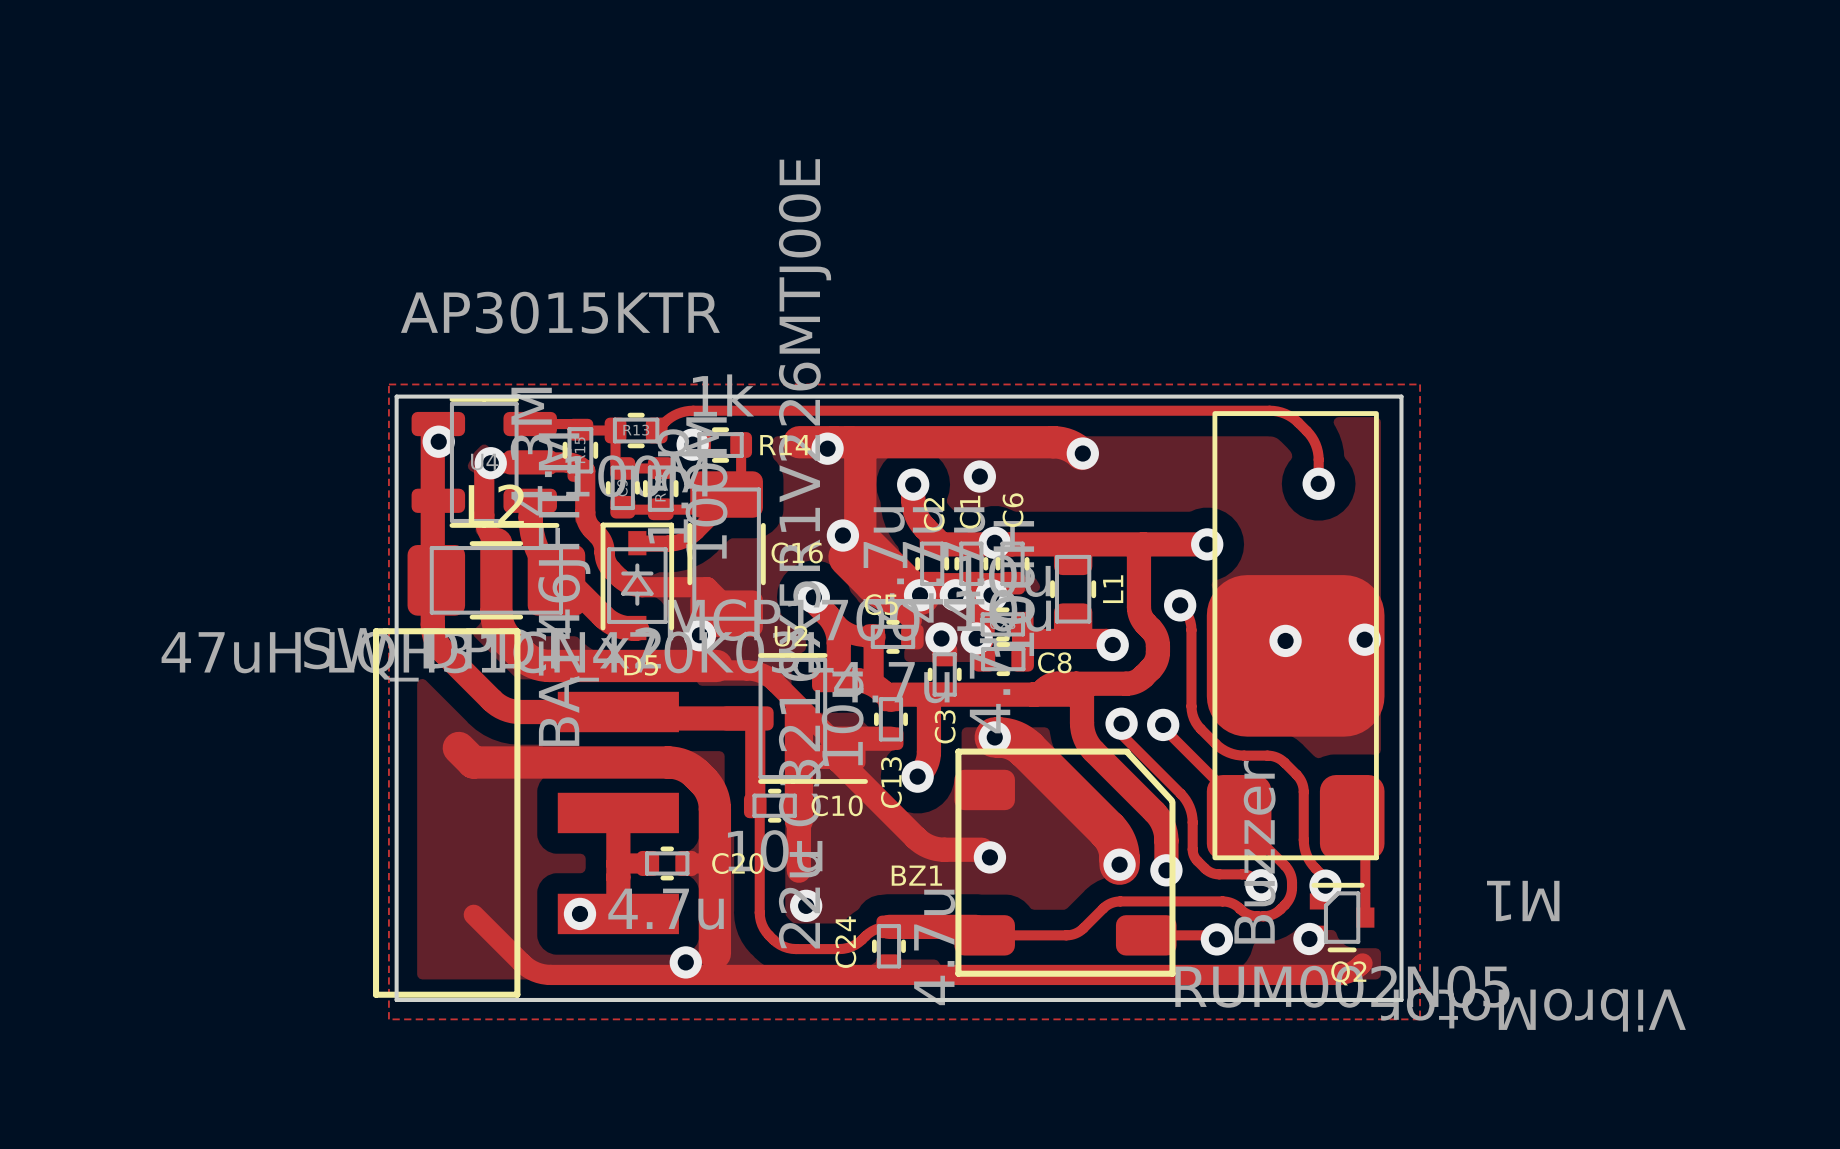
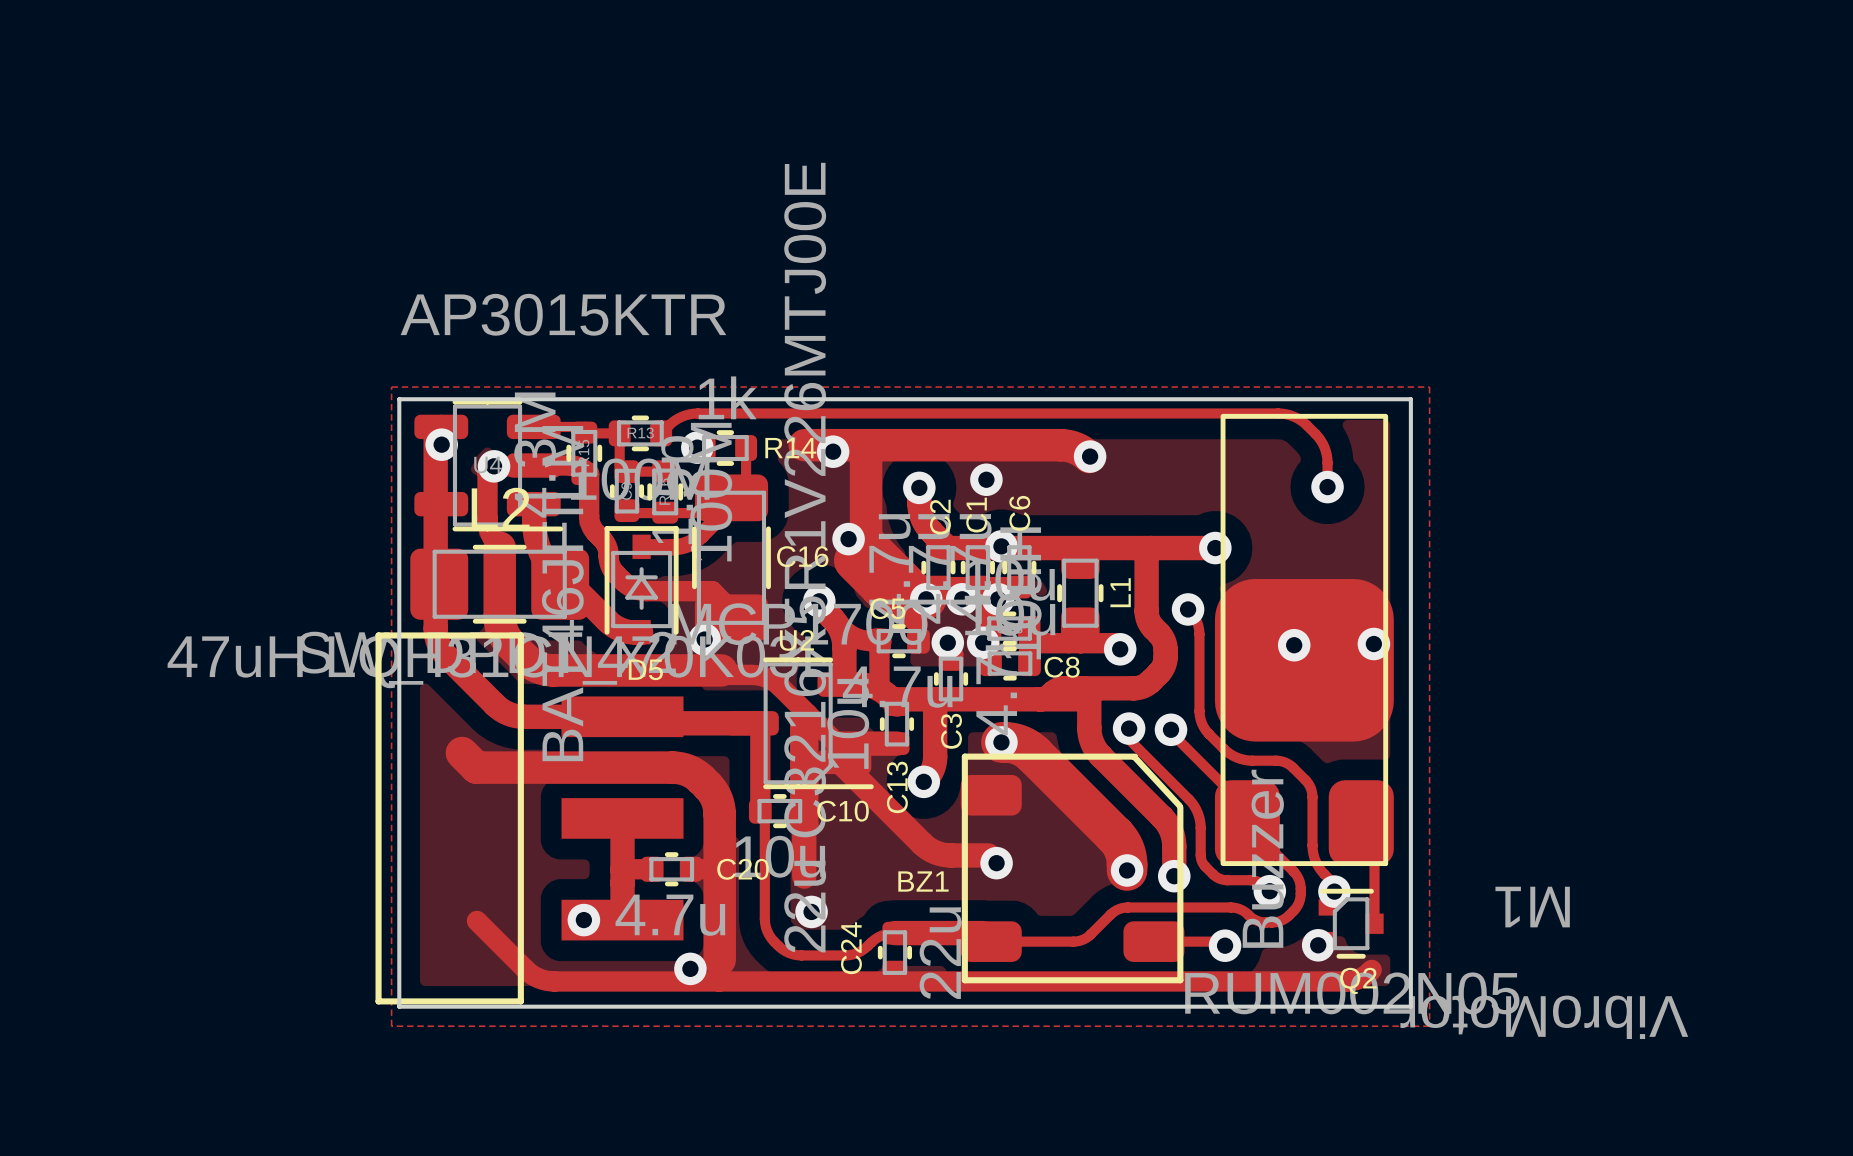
C24 value: 4.7u (934, 947) -> 22u (940, 953)

